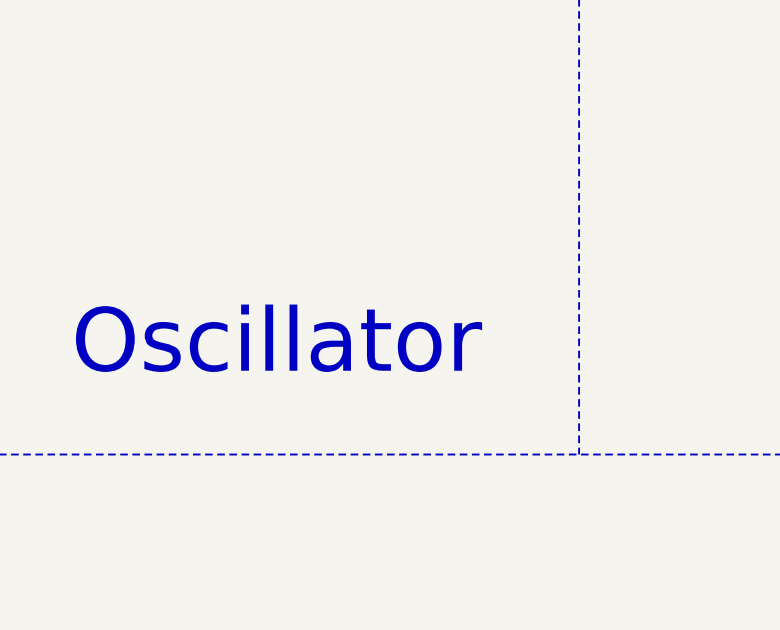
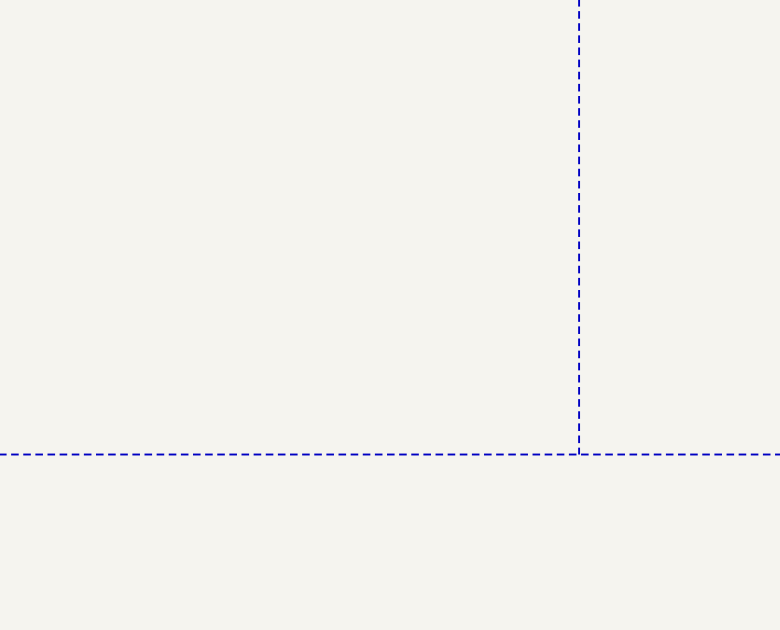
text: Oscillator (279, 338) -> none

